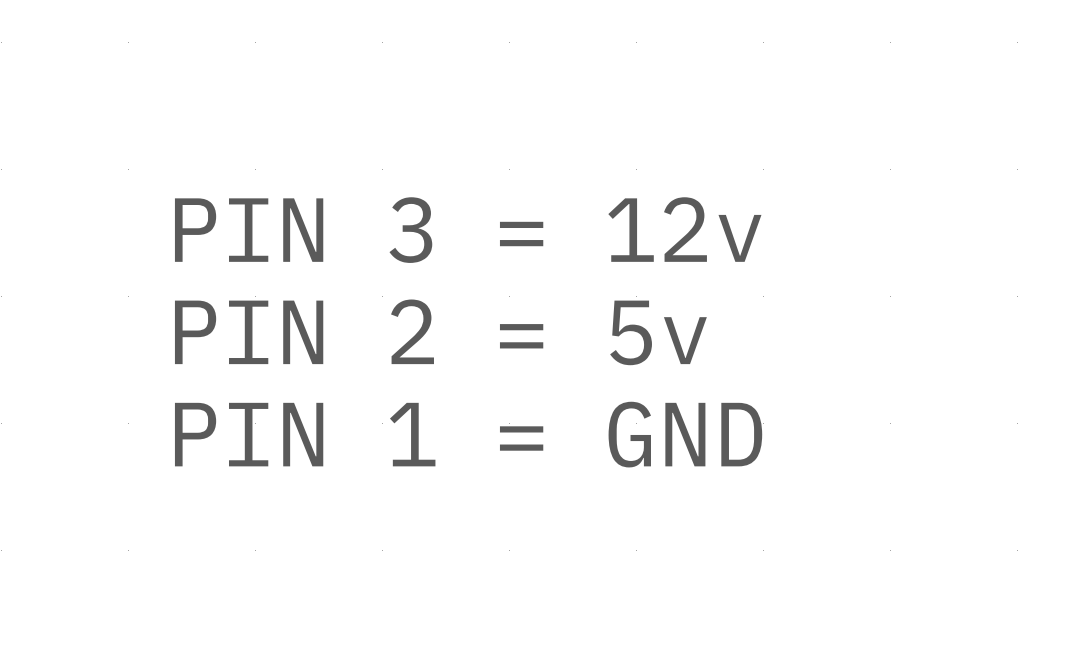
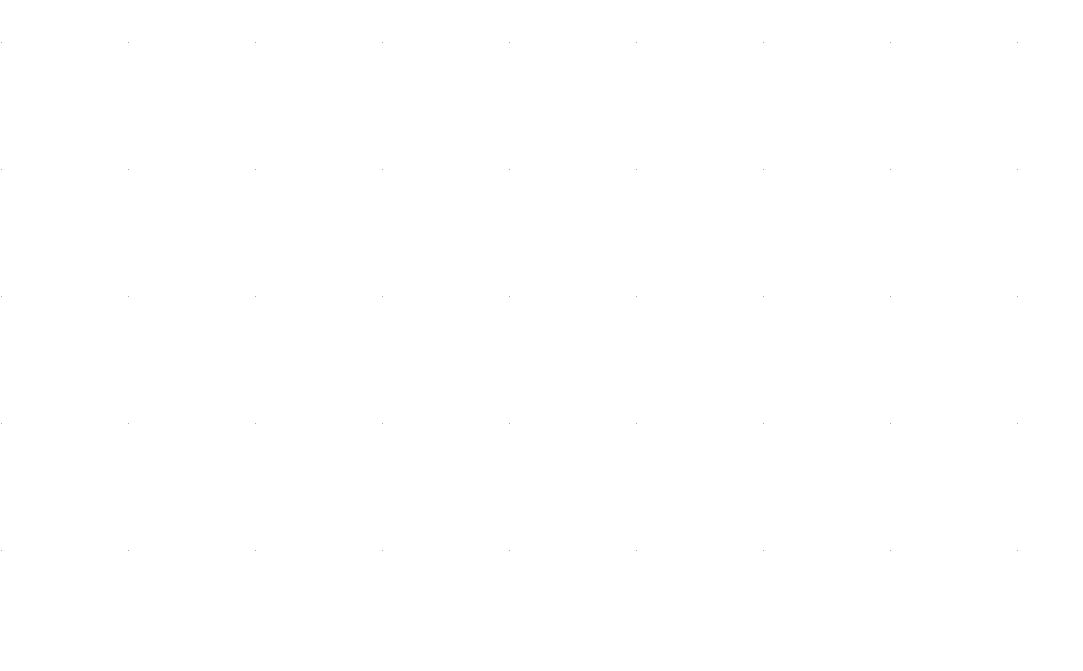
text: PIN 3 = 12v (468, 230) -> none
text: PIN 2 = 5v (440, 332) -> none
text: PIN 1 = GND (468, 434) -> none

